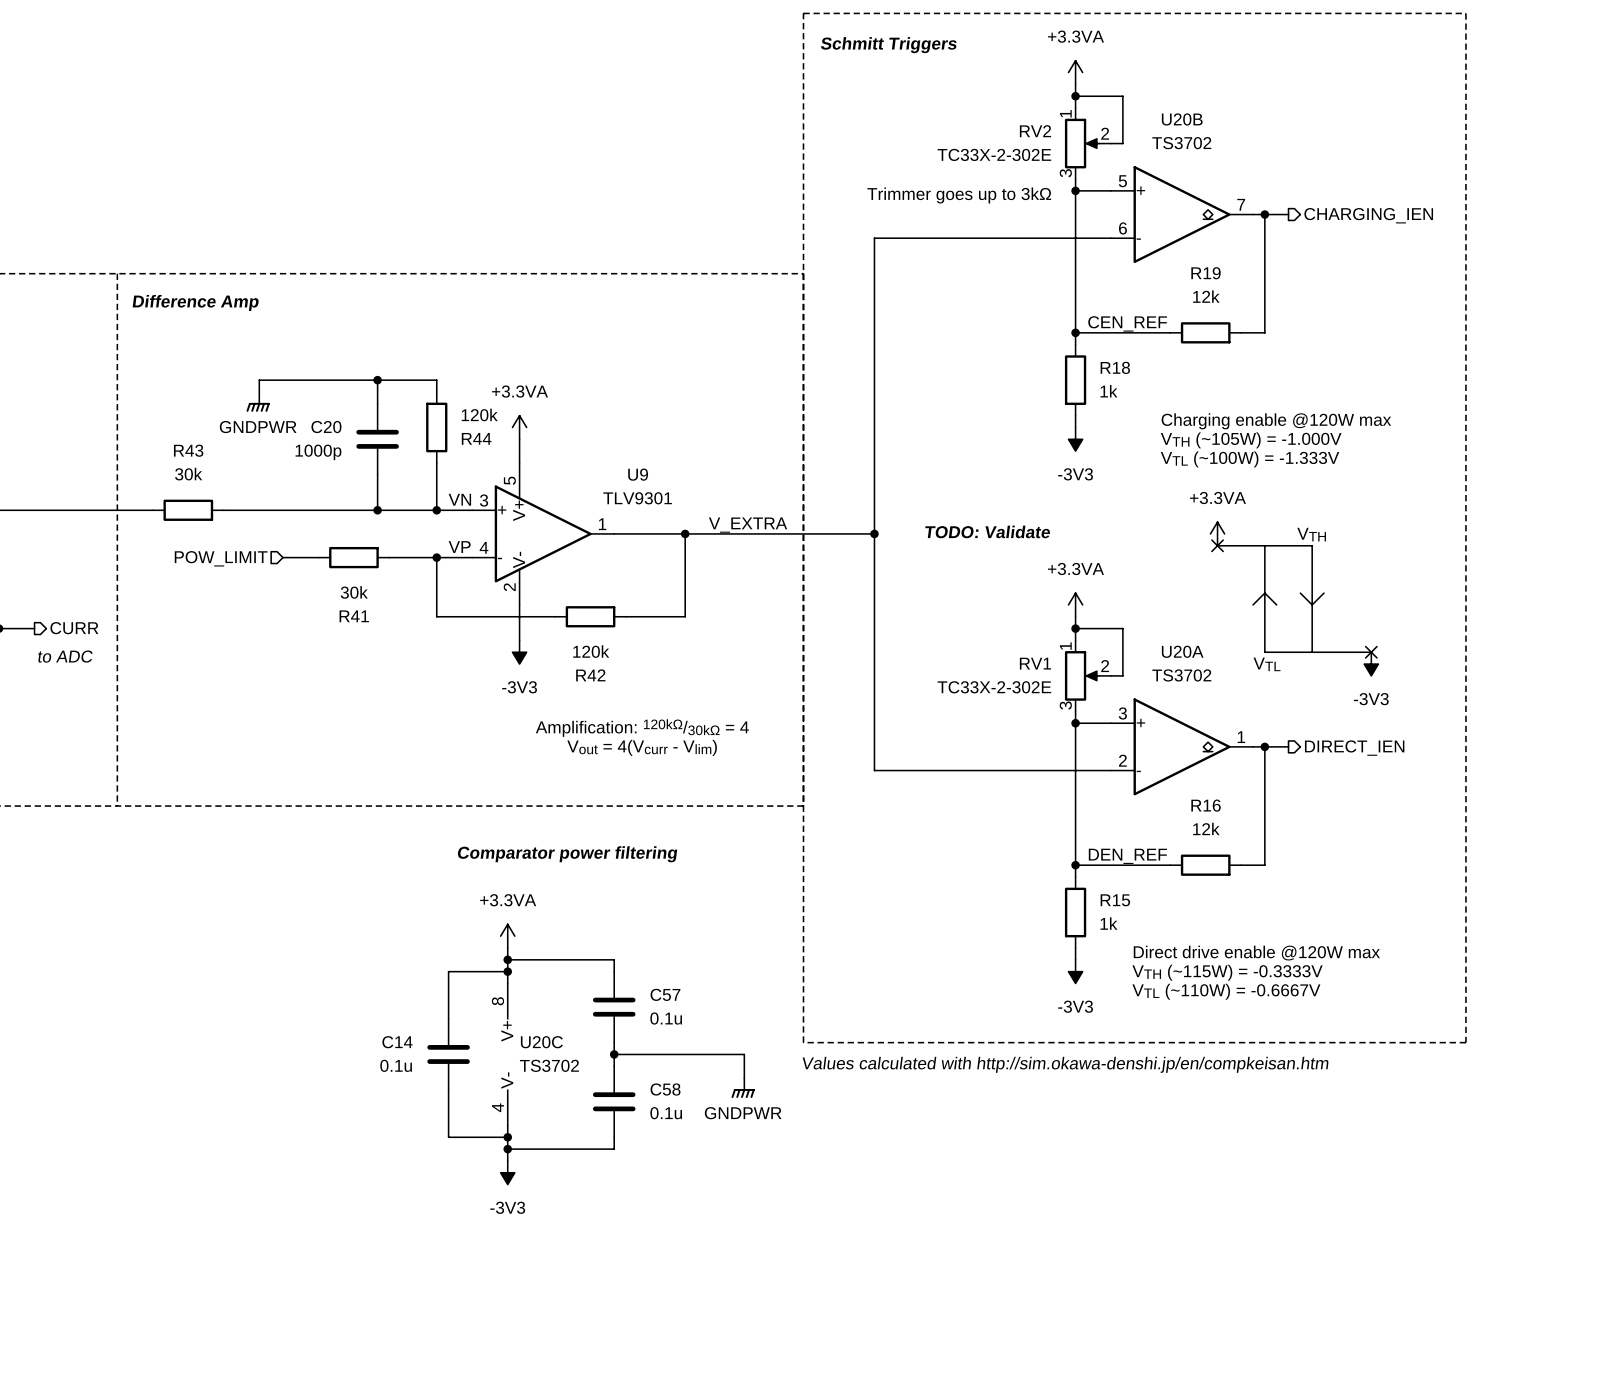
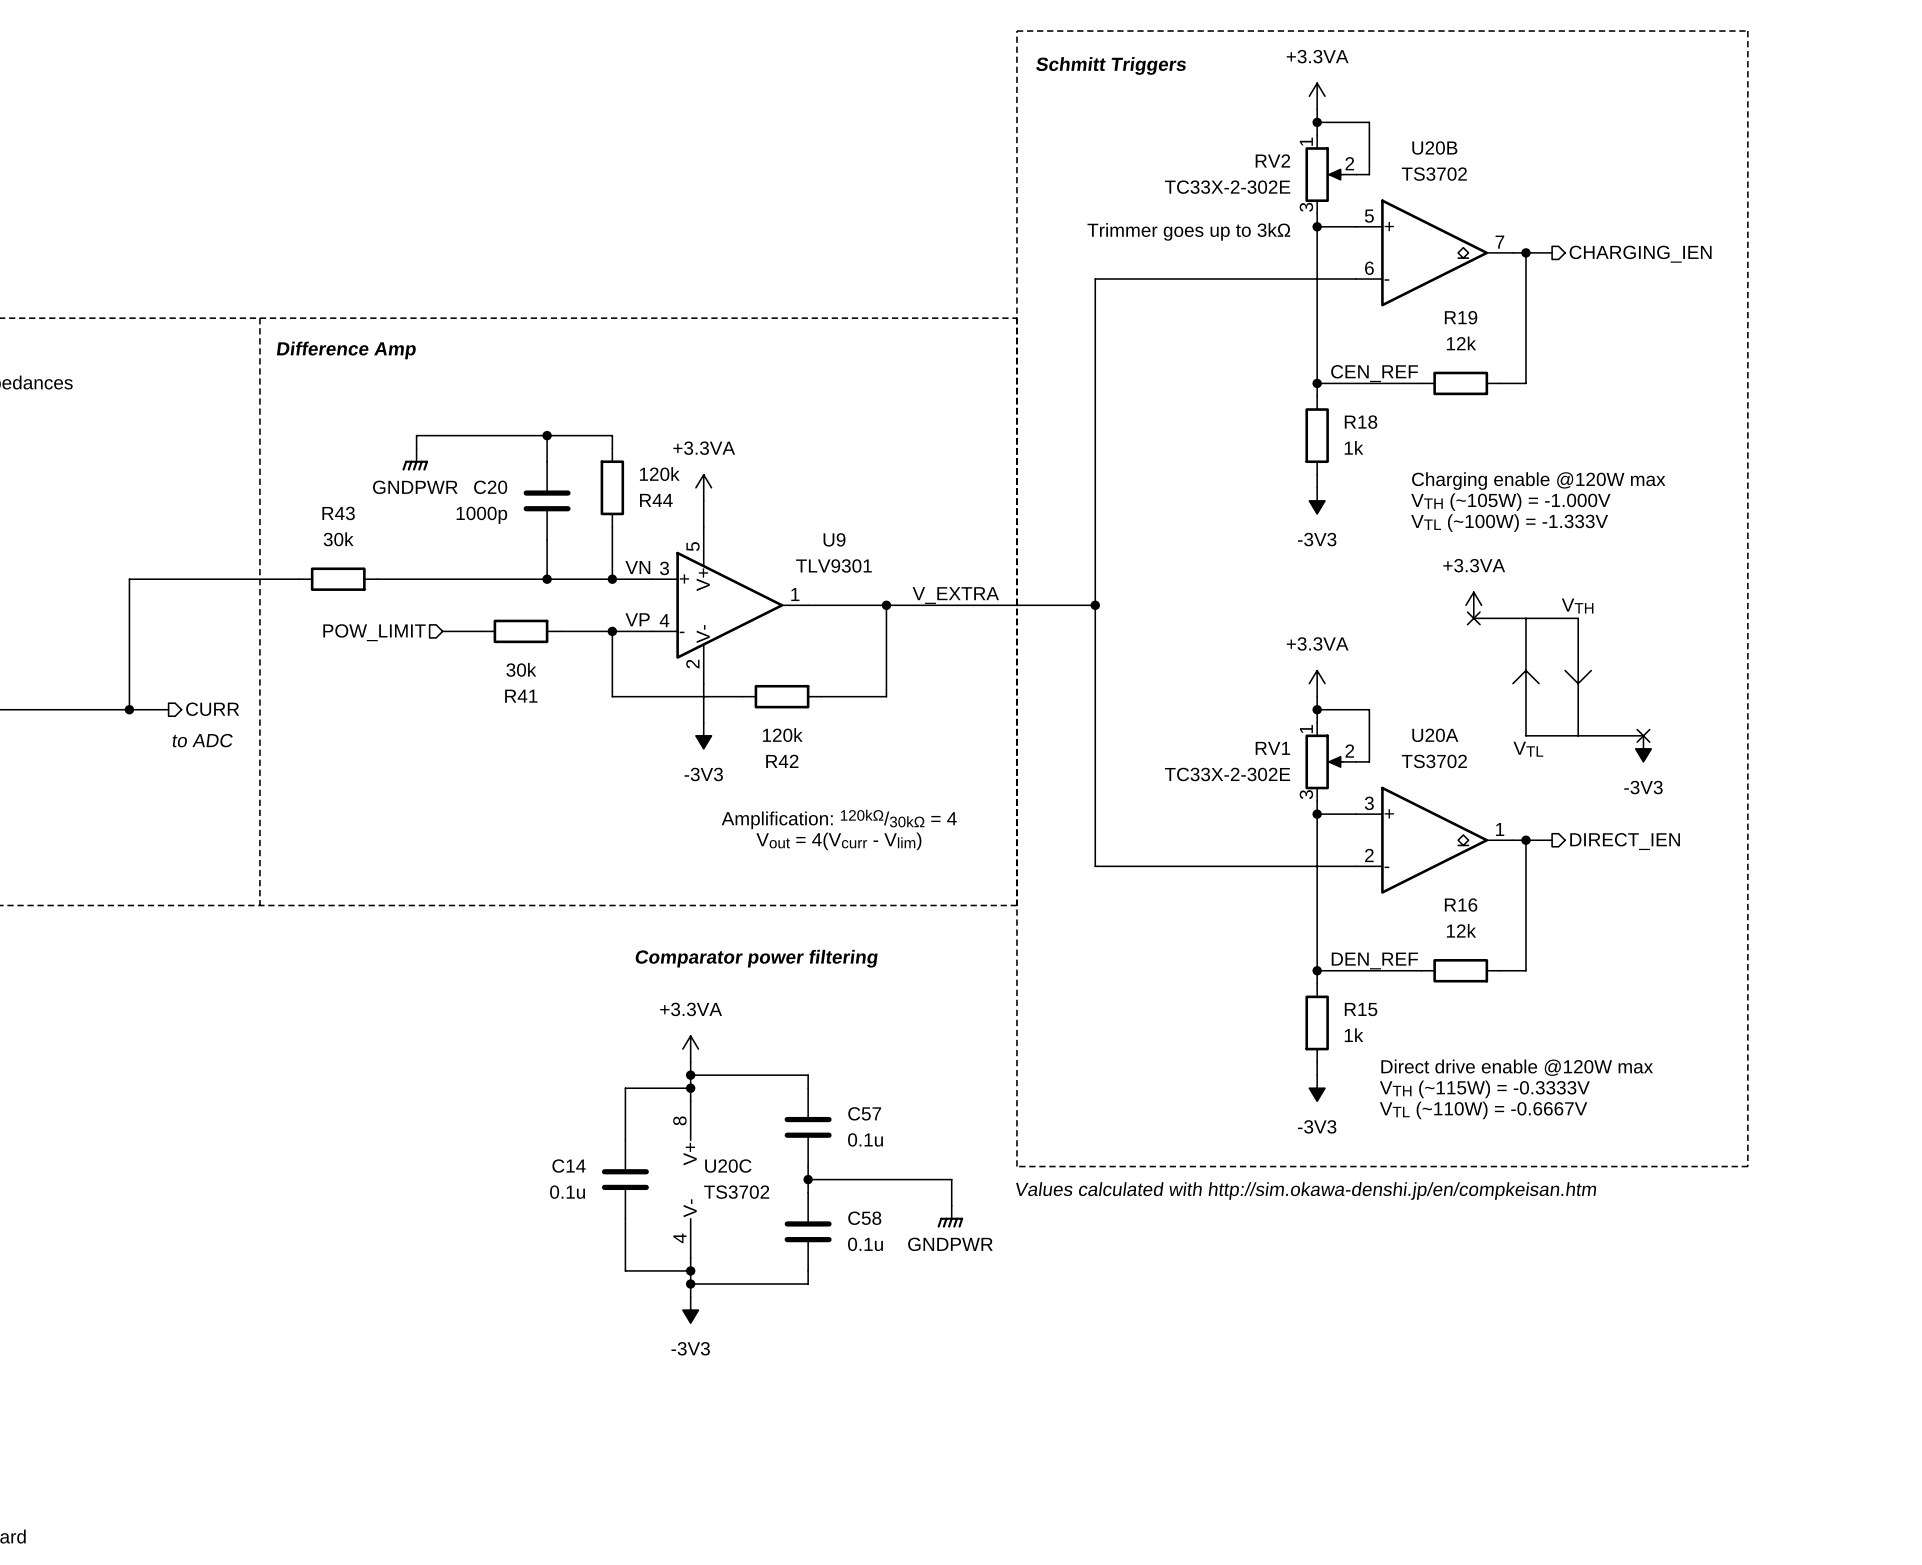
text: TODO: Validate (987, 531) -> none

